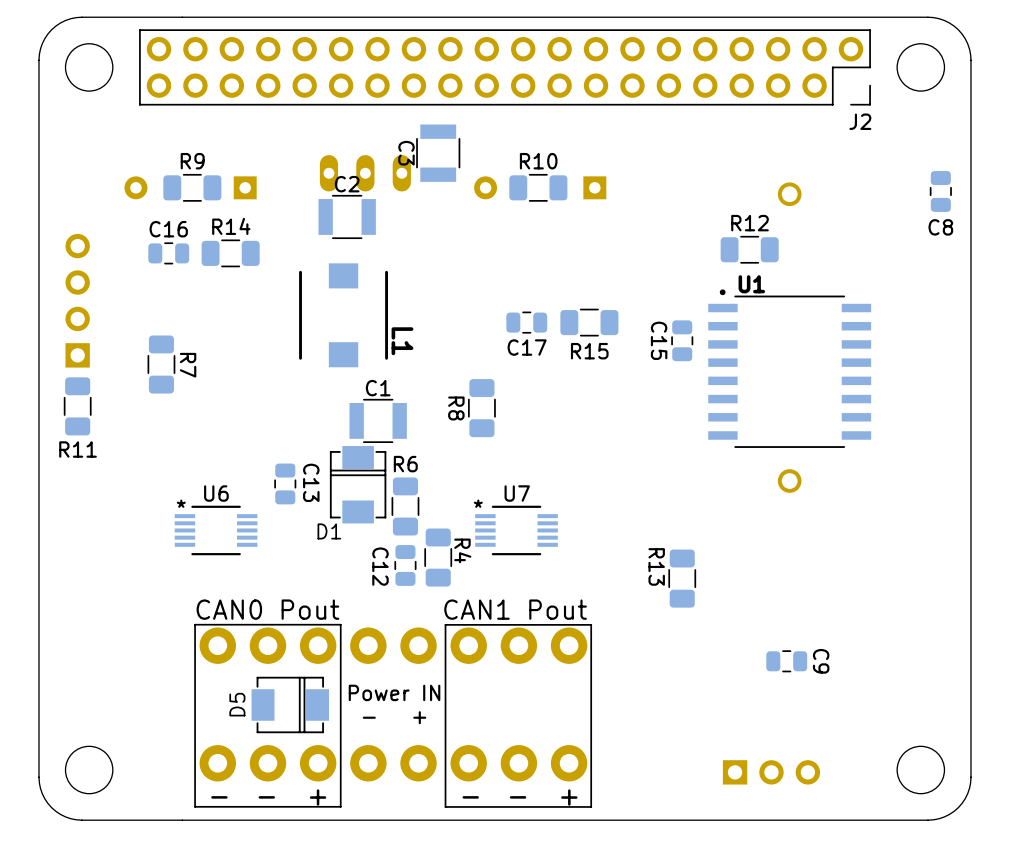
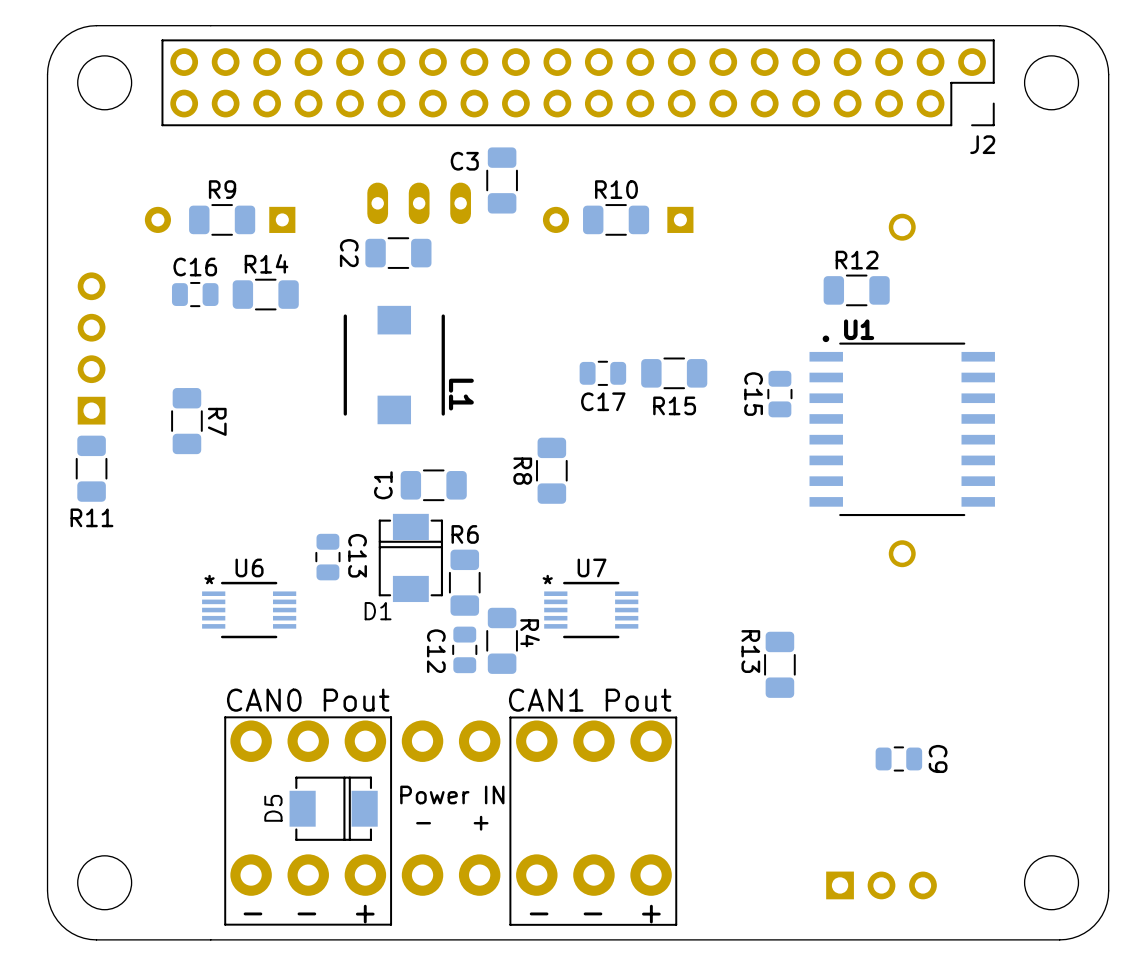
C3 footprint: [416, 124, 461, 182] -> [486, 147, 518, 214]
C3 name rotation: 0° (406, 153) -> 90° counterclockwise (464, 161)
C2 name rotation: 0° (347, 184) -> 90° clockwise (349, 253)
C2 name position: C2 (347, 184) -> C2 (349, 253)
C8: (940, 191) -> none
C2 footprint: [318, 194, 376, 240] -> [365, 237, 432, 269]
C1 name rotation: 0° (378, 388) -> 90° counterclockwise (383, 485)
C1 name position: C1 (378, 388) -> C1 (383, 485)
C1 footprint: [349, 398, 407, 444] -> [400, 469, 467, 502]

